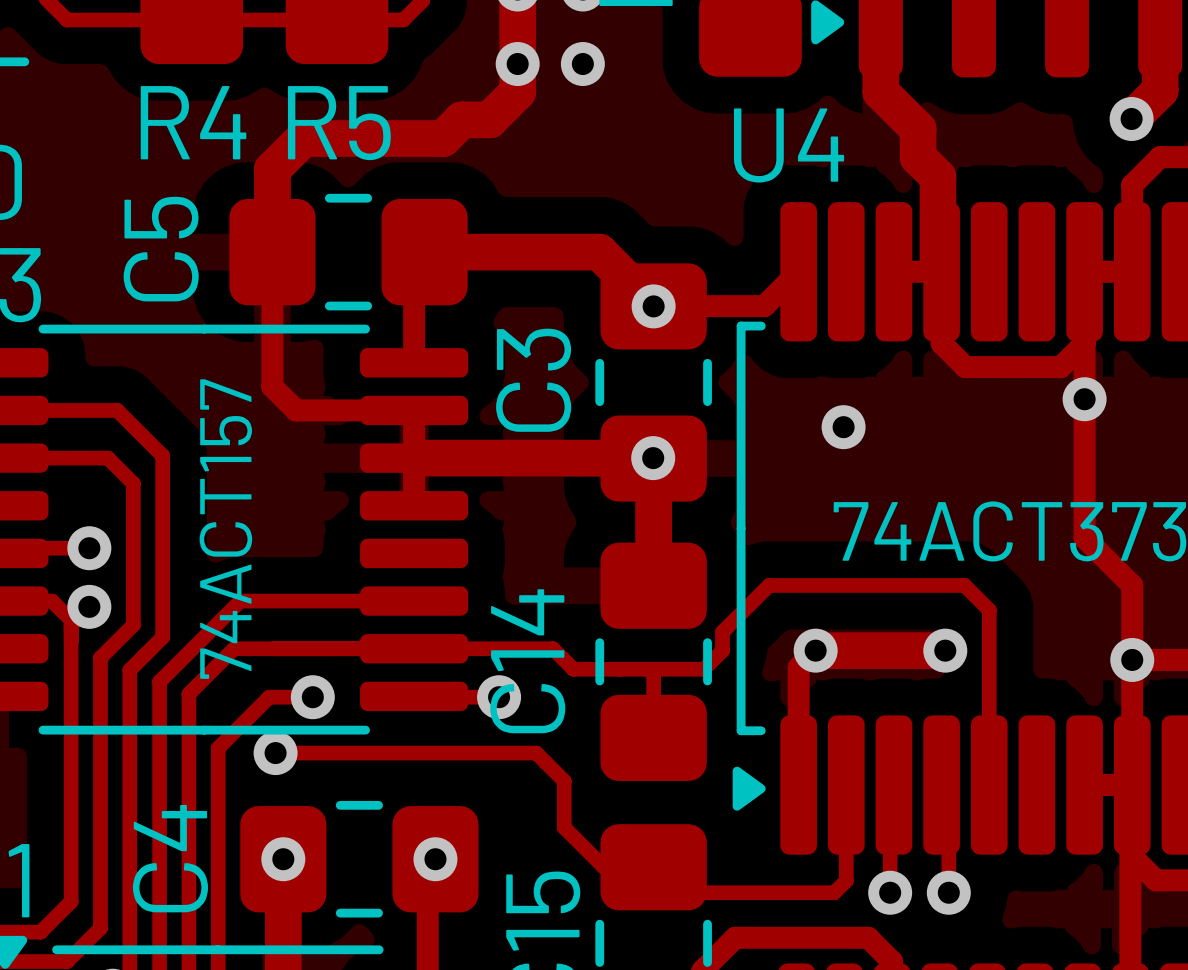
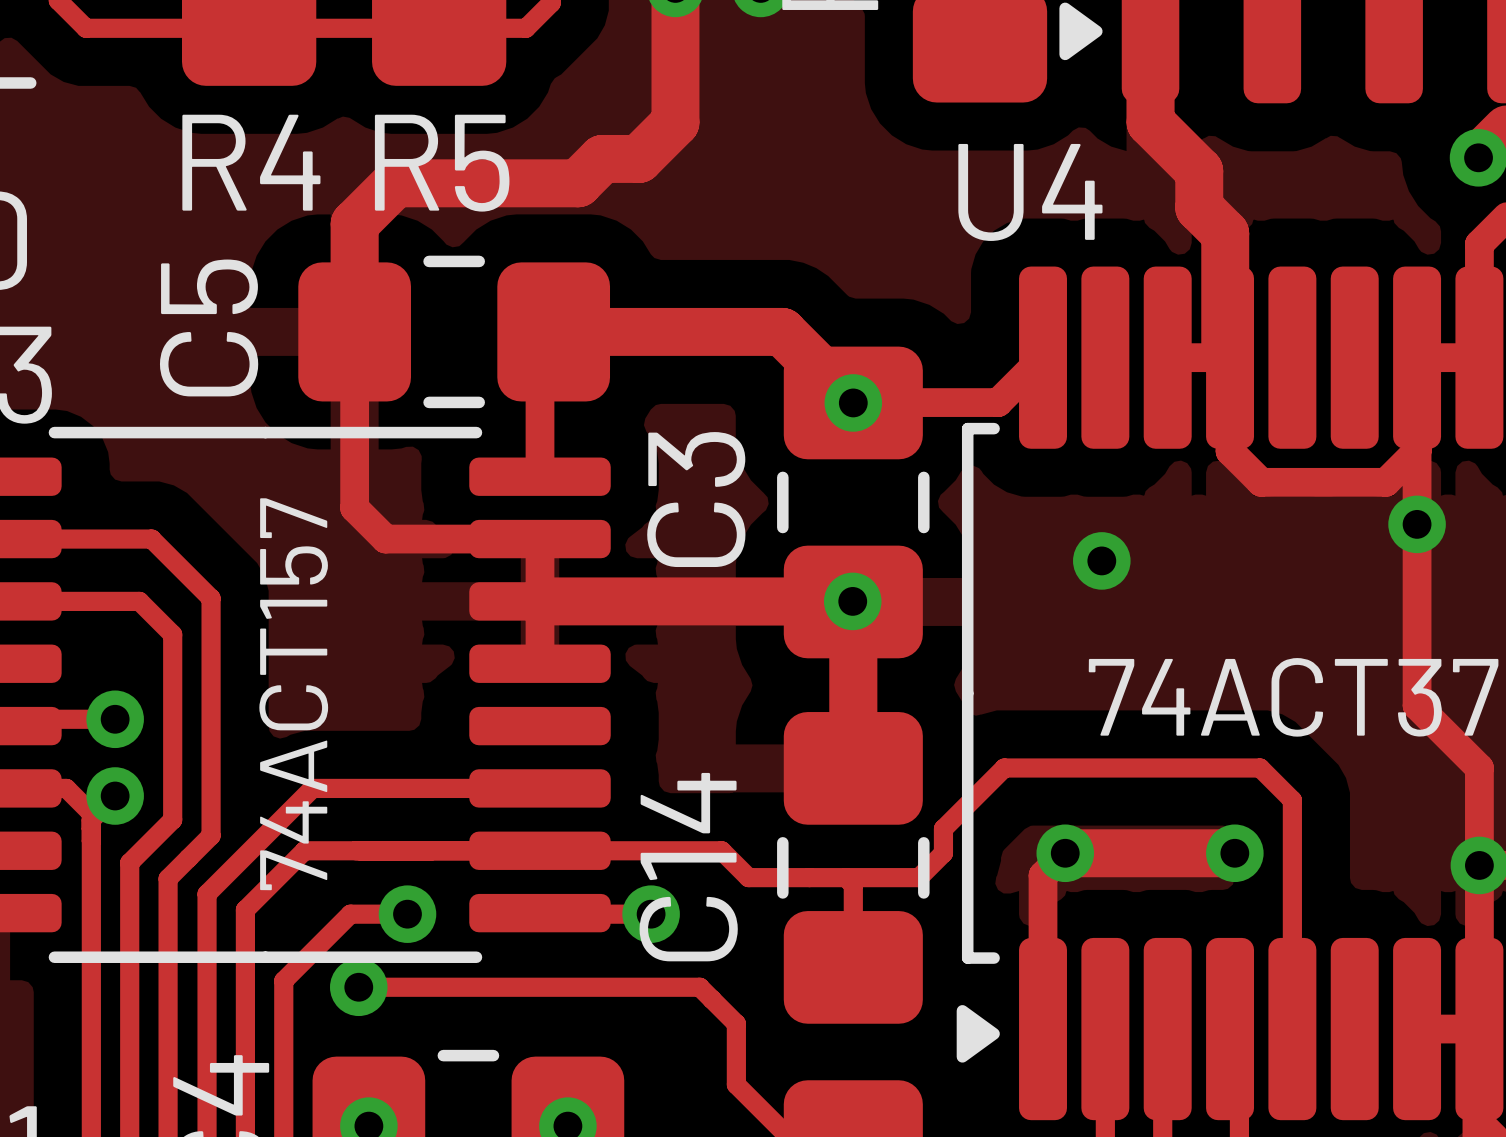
via: (517, 64) -> none
via: (582, 64) -> none

